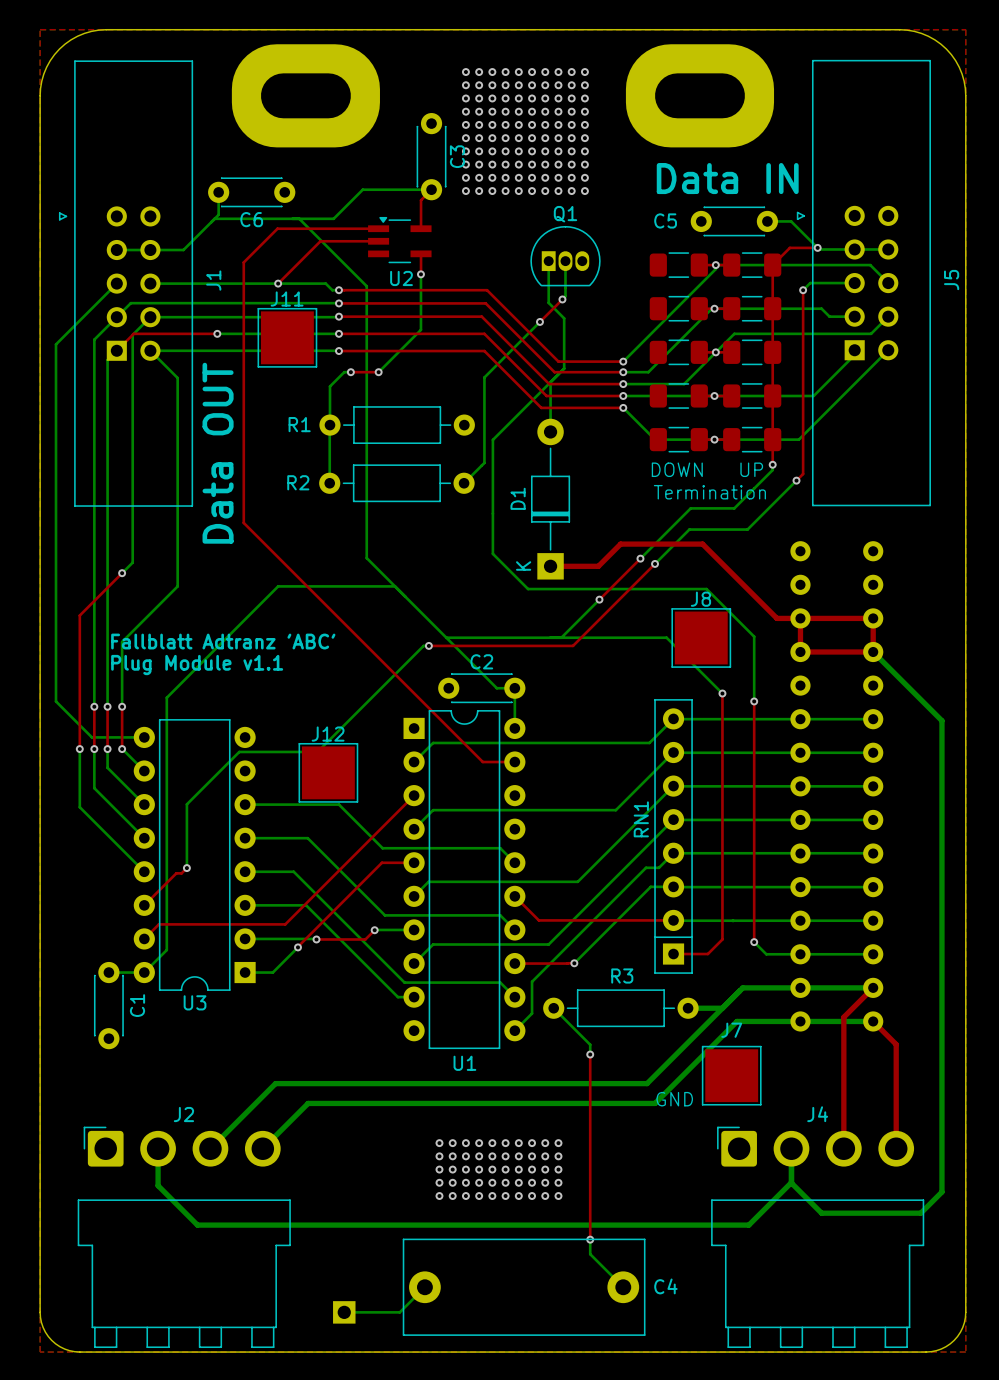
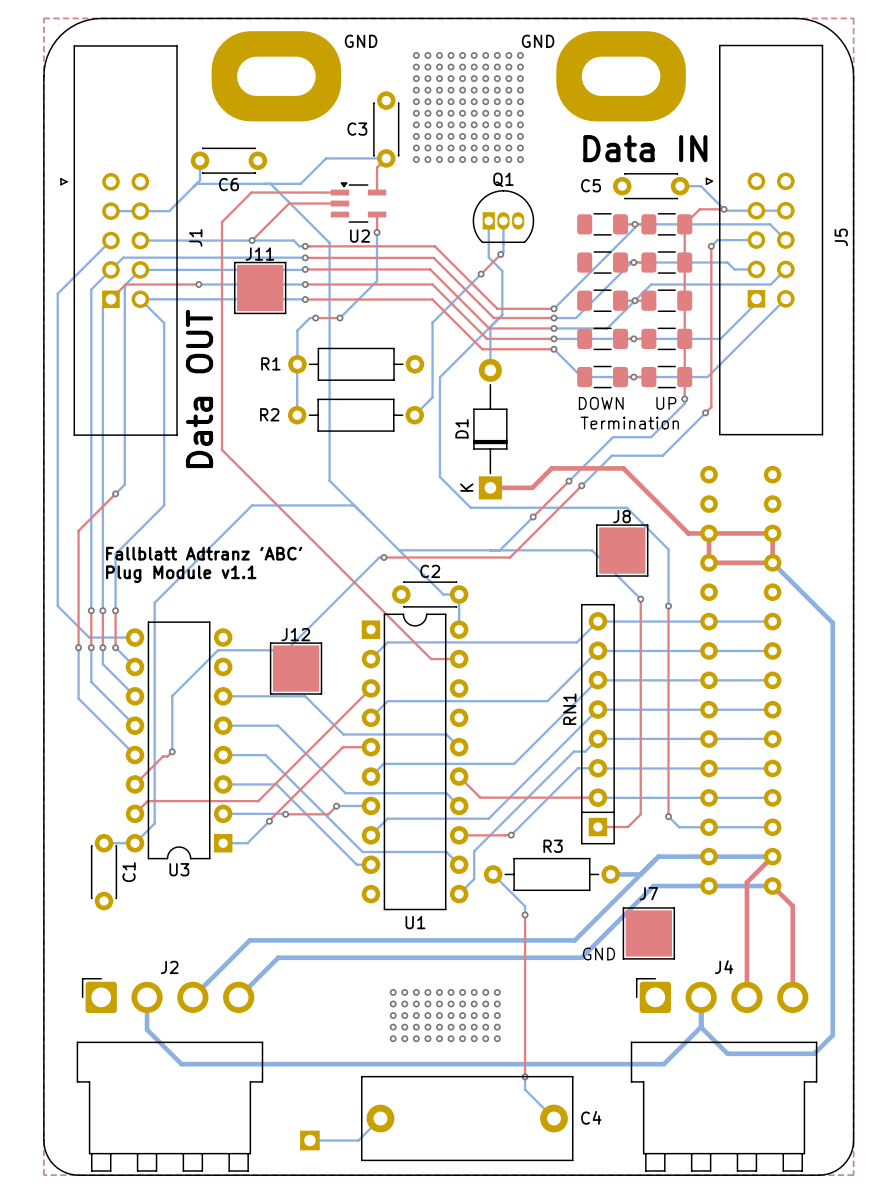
text: none -> GND (361, 41)
text: none -> GND (538, 41)
C3 name rotation: 0° (457, 156) -> 90° clockwise (357, 129)
C3 name position: C3 (457, 156) -> C3 (357, 129)

